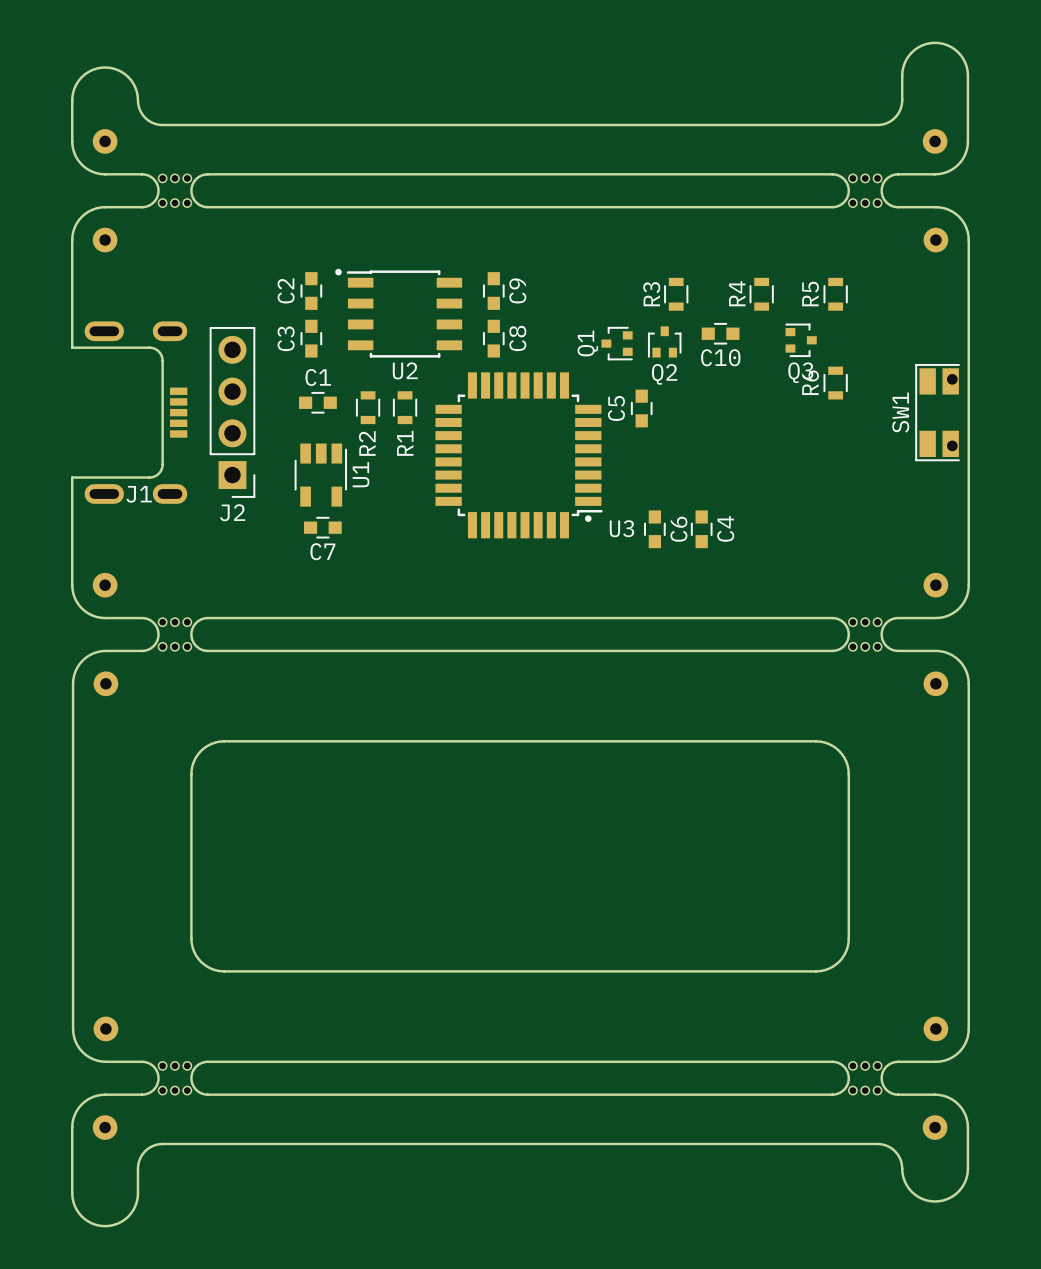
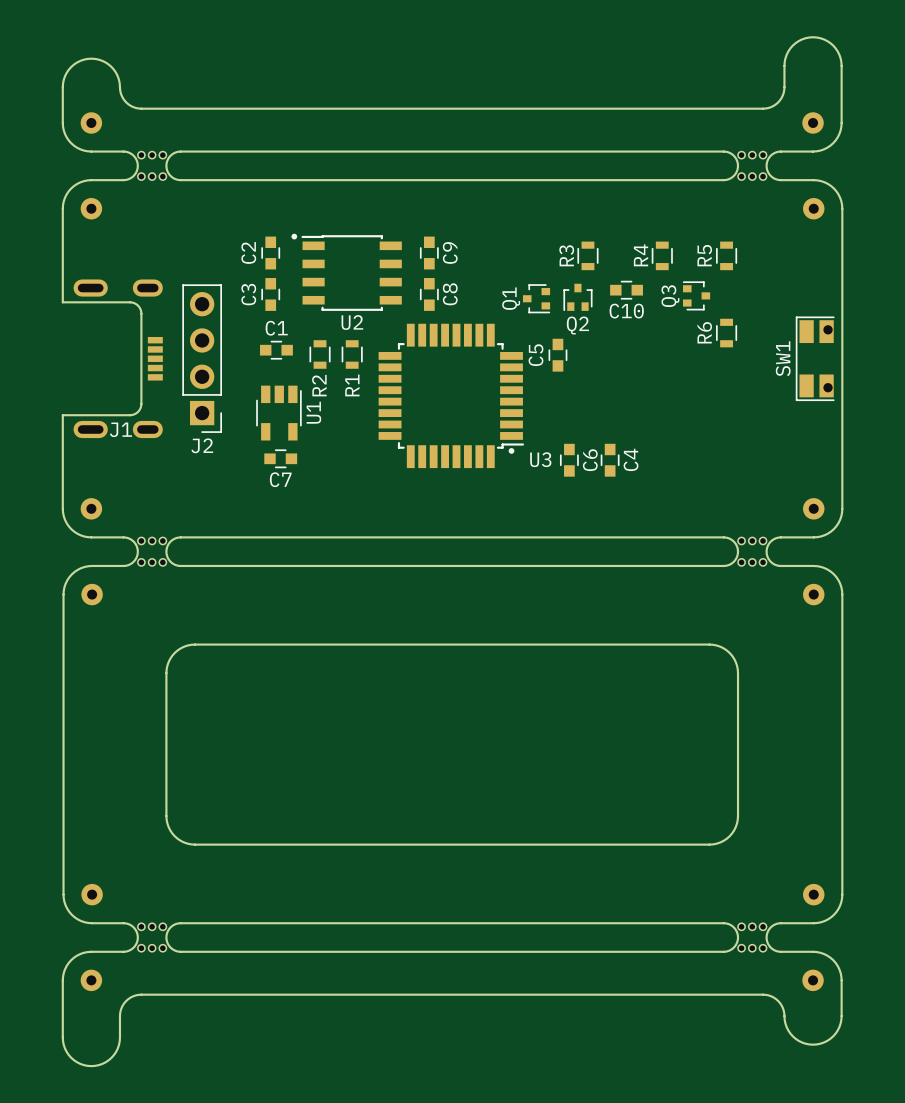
Q3 name rotation: 0° (800, 372) -> 90° counterclockwise (670, 296)
Q3 name position: Q3 (800, 372) -> Q3 (670, 296)

